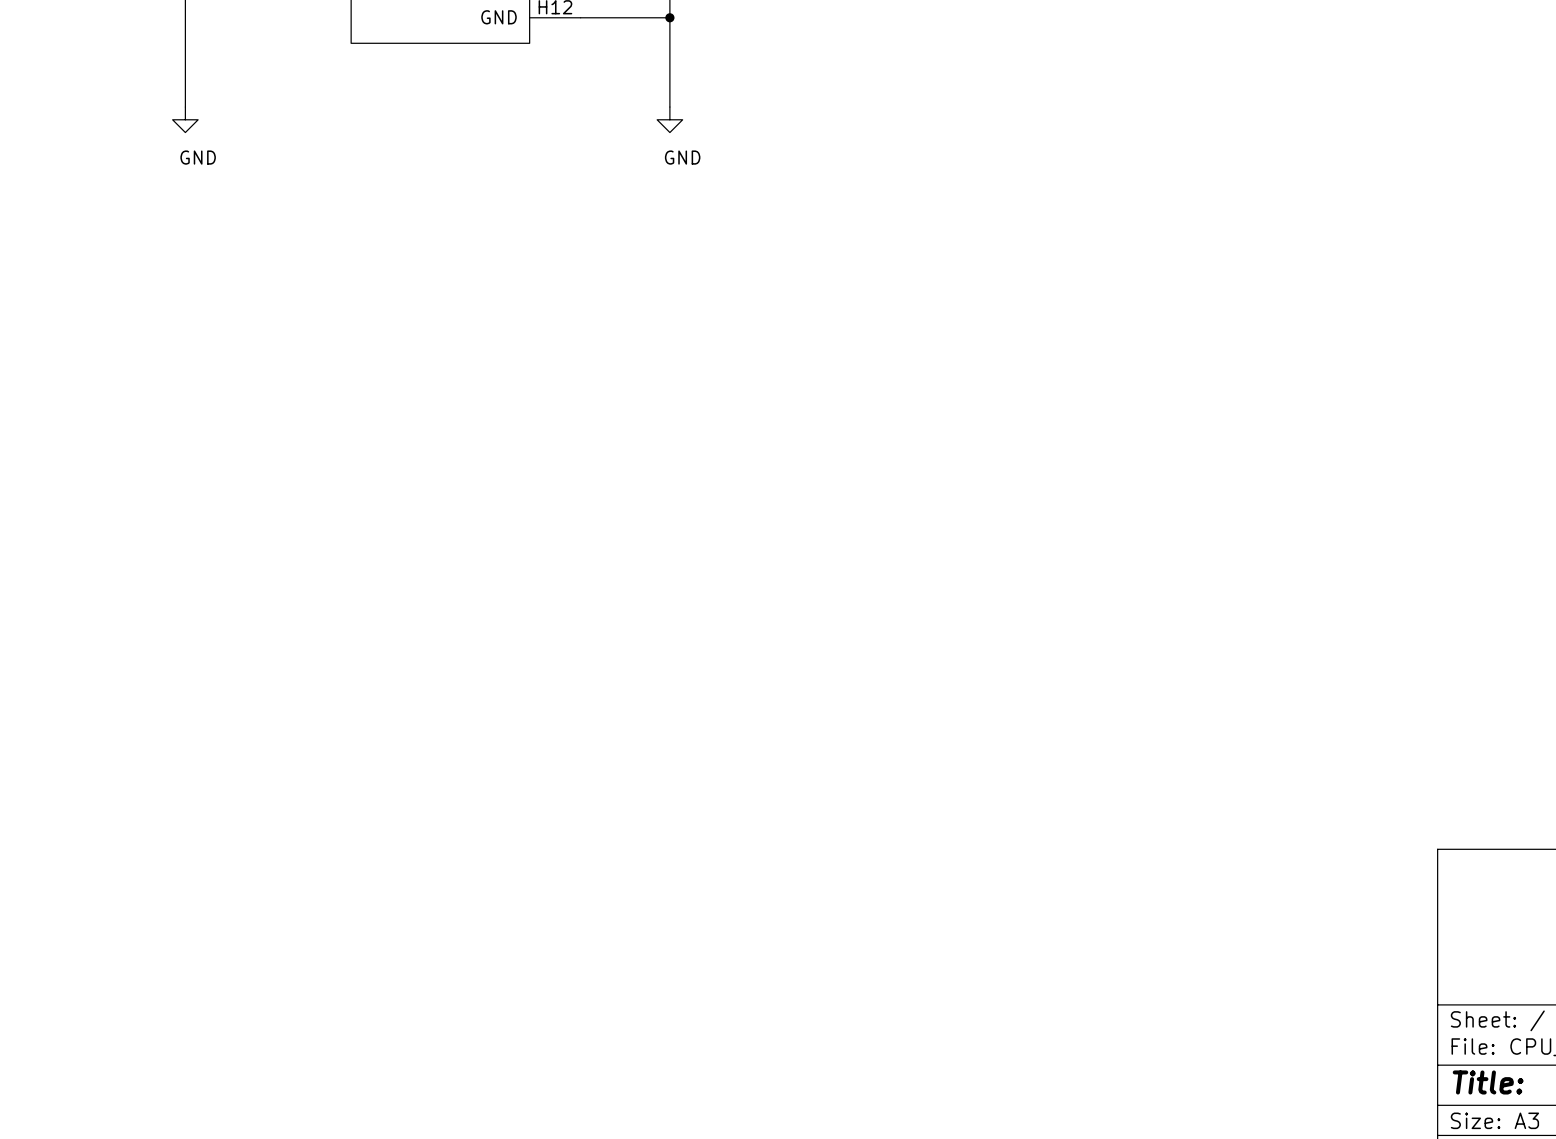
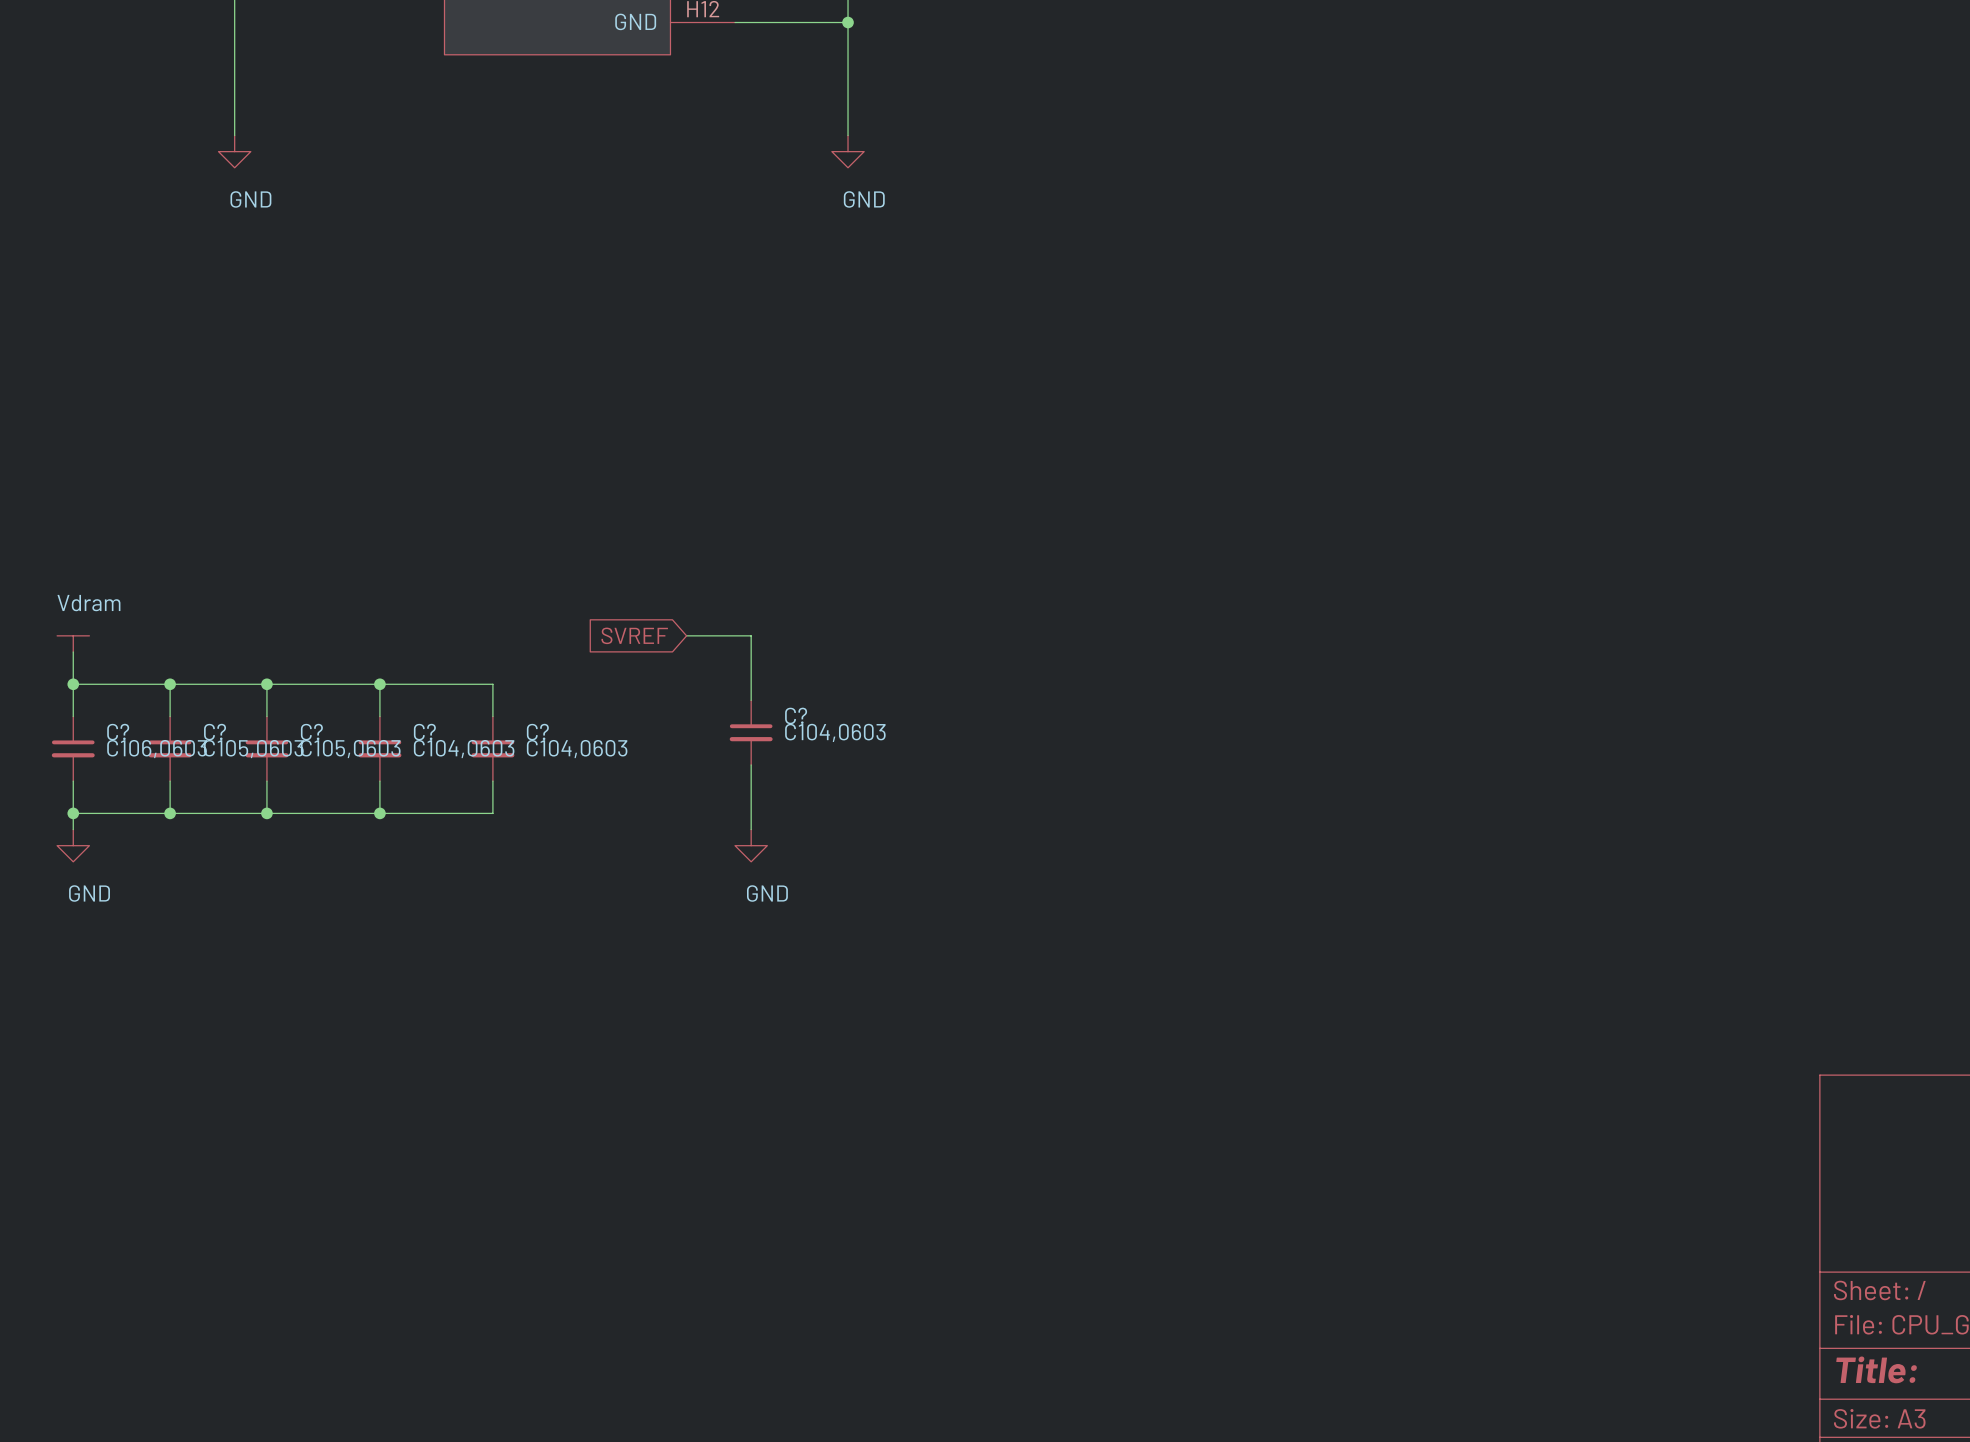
global label: none -> SVREF (634, 635)
wire: none -> (686, 635) (751, 635) (751, 700)
power symbol: none -> Vdram (73, 643)
wire: none -> (73, 652) (73, 716)
wire: none -> (73, 684) (492, 684) (492, 716)
junction: none -> (73, 684)
wire: none -> (170, 684) (170, 716)
junction: none -> (170, 684)
wire: none -> (266, 684) (266, 716)
junction: none -> (266, 684)
wire: none -> (379, 684) (379, 716)
junction: none -> (379, 684)
C?: none -> C104,0603 (751, 732)
C?: none -> C106,0603 (73, 748)
C?: none -> C105,0603 (170, 748)
C?: none -> C105,0603 (266, 748)
C?: none -> C104,0603 (379, 748)
C?: none -> C104,0603 (492, 748)
wire: none -> (751, 764) (751, 829)
wire: none -> (73, 781) (73, 829)
wire: none -> (170, 781) (170, 813)
wire: none -> (266, 781) (266, 813)
wire: none -> (379, 781) (379, 813)
wire: none -> (492, 781) (492, 813) (73, 813)
junction: none -> (73, 813)
junction: none -> (170, 813)
junction: none -> (266, 813)
junction: none -> (379, 813)
power symbol: none -> GND (73, 845)
power symbol: none -> GND (751, 845)

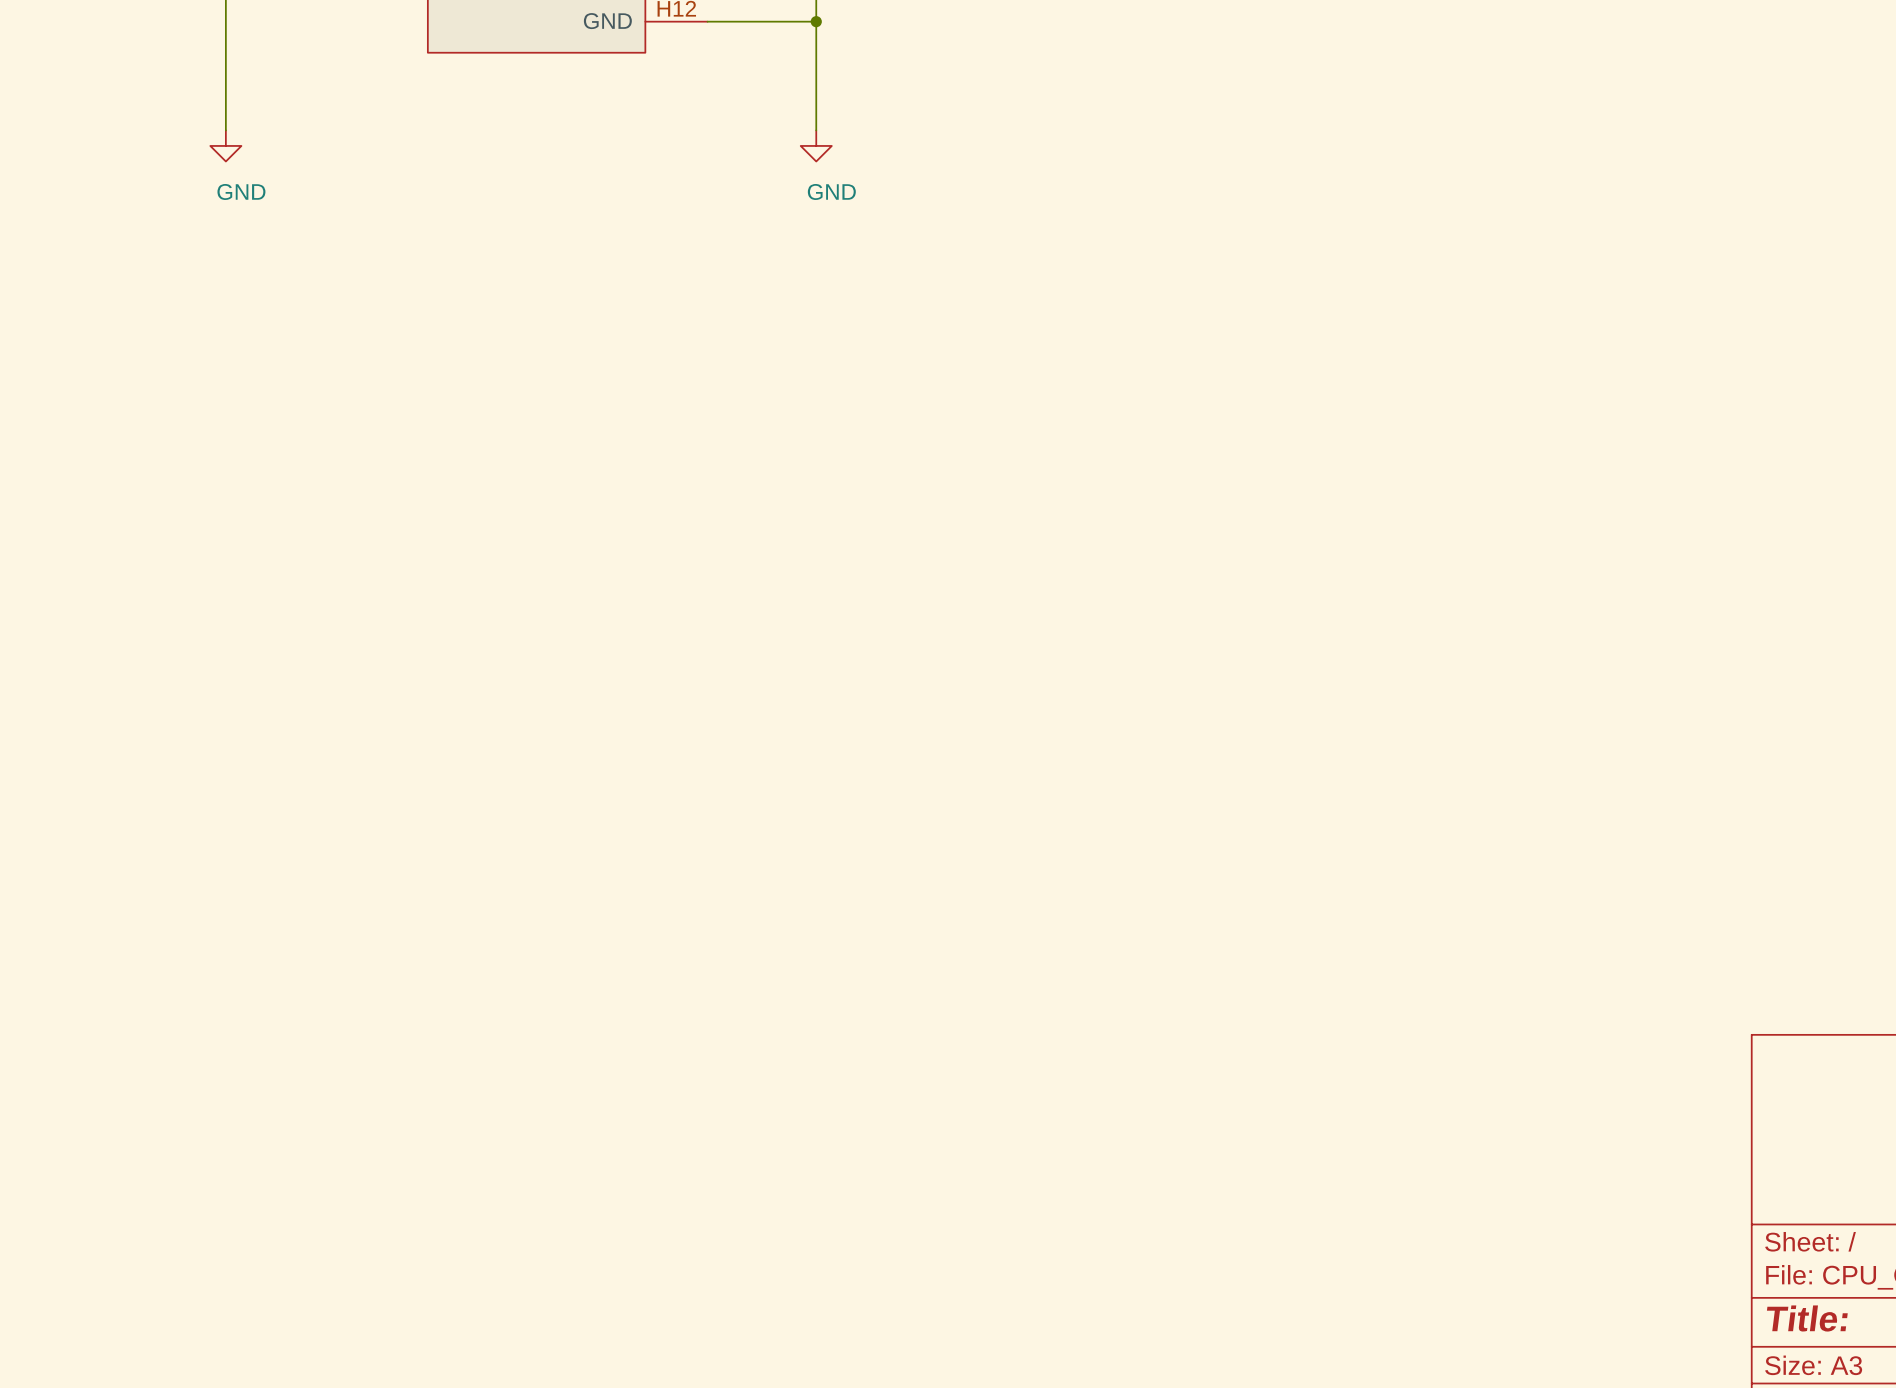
global label: SVREF (634, 635) -> none
wire: (686, 635) (751, 635) (751, 700) -> none
power symbol: Vdram (73, 643) -> none
wire: (73, 652) (73, 716) -> none
wire: (73, 684) (492, 684) (492, 716) -> none
junction: (73, 684) -> none
wire: (170, 684) (170, 716) -> none
junction: (170, 684) -> none
wire: (266, 684) (266, 716) -> none
junction: (266, 684) -> none
wire: (379, 684) (379, 716) -> none
junction: (379, 684) -> none
C?: C104,0603 (751, 732) -> none
C?: C106,0603 (73, 748) -> none
C?: C105,0603 (170, 748) -> none
C?: C105,0603 (266, 748) -> none
C?: C104,0603 (379, 748) -> none
C?: C104,0603 (492, 748) -> none
wire: (751, 764) (751, 829) -> none
wire: (73, 781) (73, 829) -> none
wire: (170, 781) (170, 813) -> none
wire: (266, 781) (266, 813) -> none
wire: (379, 781) (379, 813) -> none
wire: (492, 781) (492, 813) (73, 813) -> none
junction: (73, 813) -> none
junction: (170, 813) -> none
junction: (266, 813) -> none
junction: (379, 813) -> none
power symbol: GND (73, 845) -> none
power symbol: GND (751, 845) -> none

